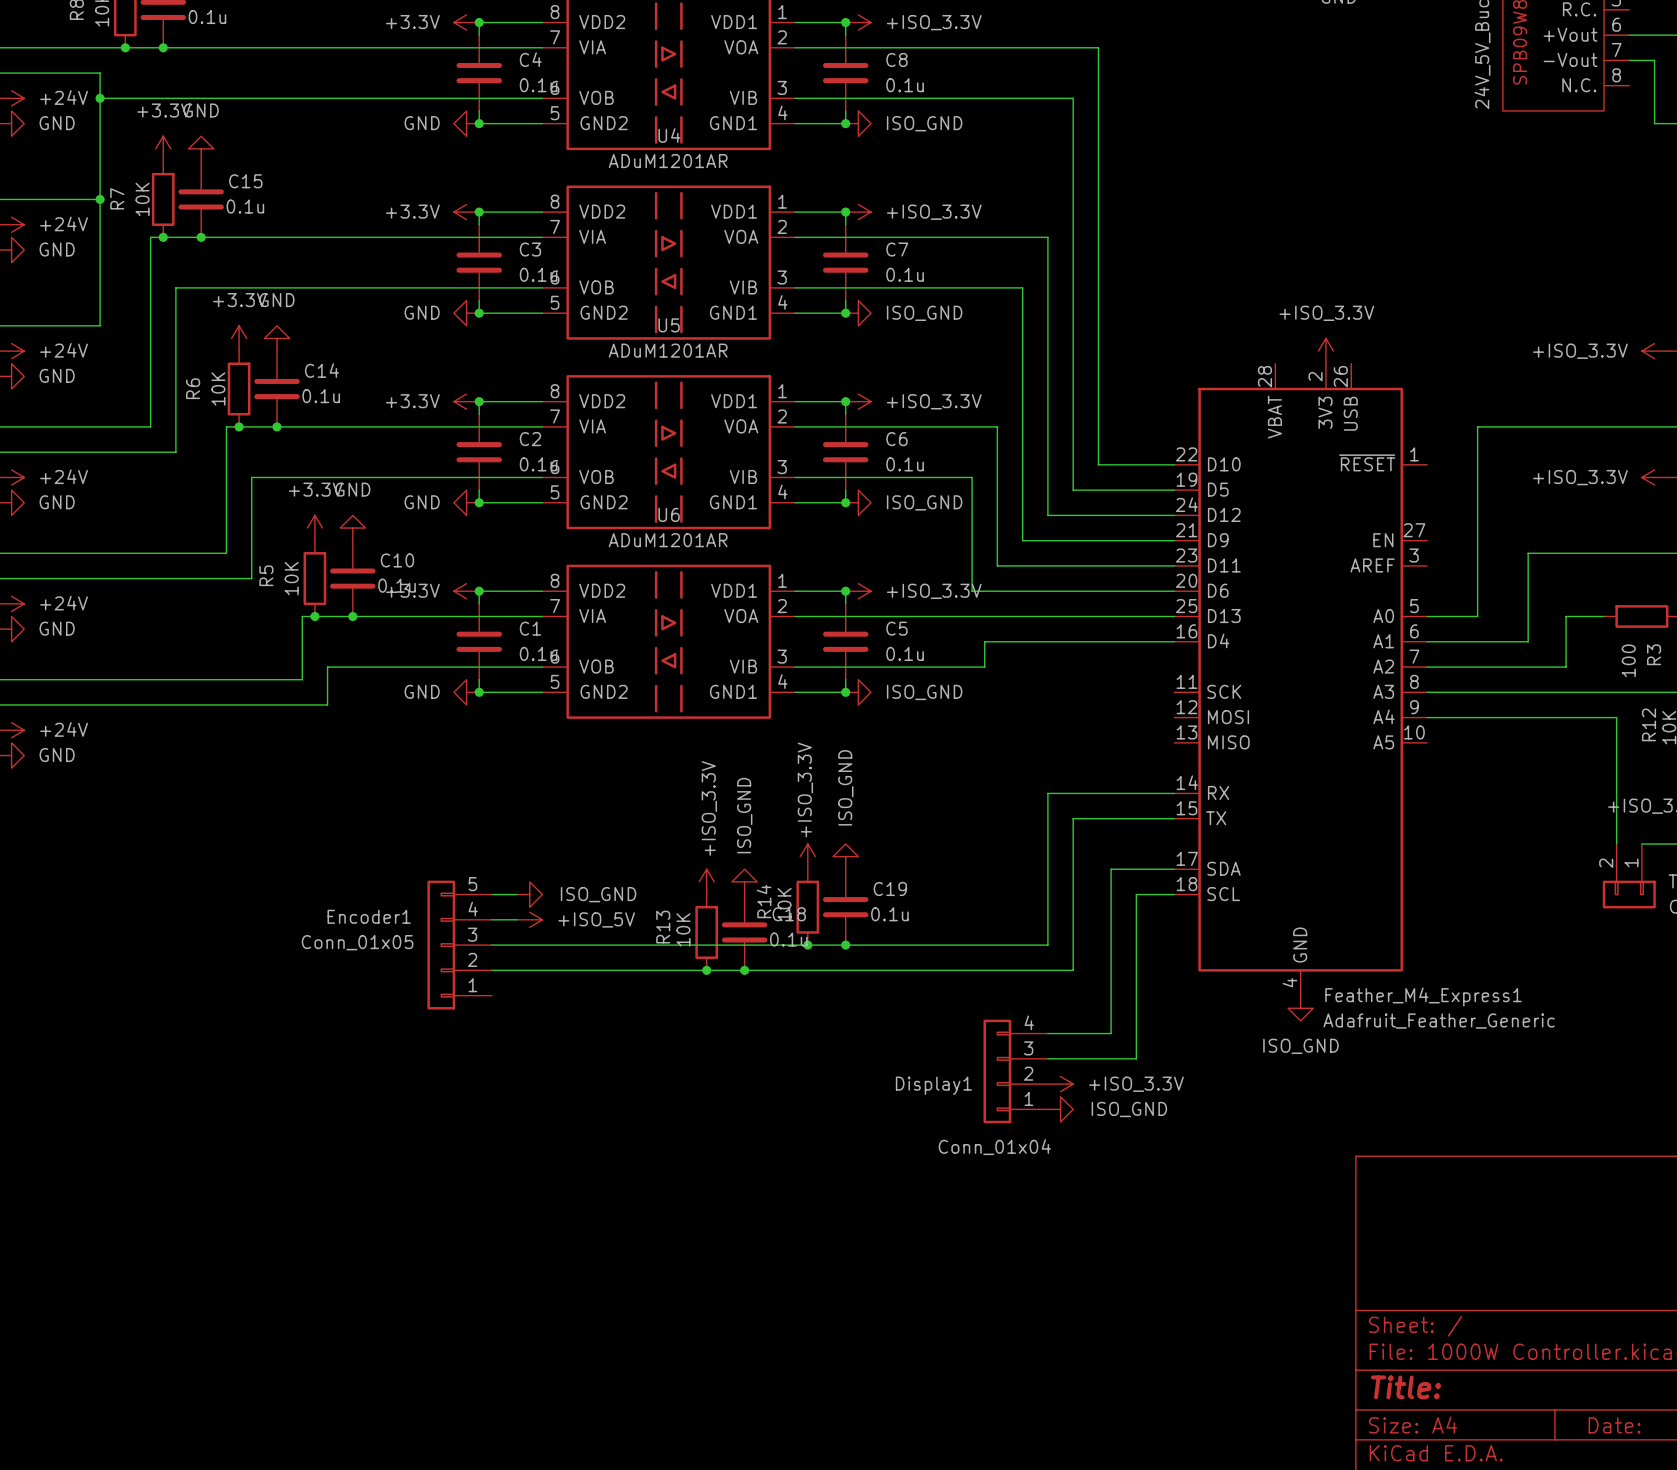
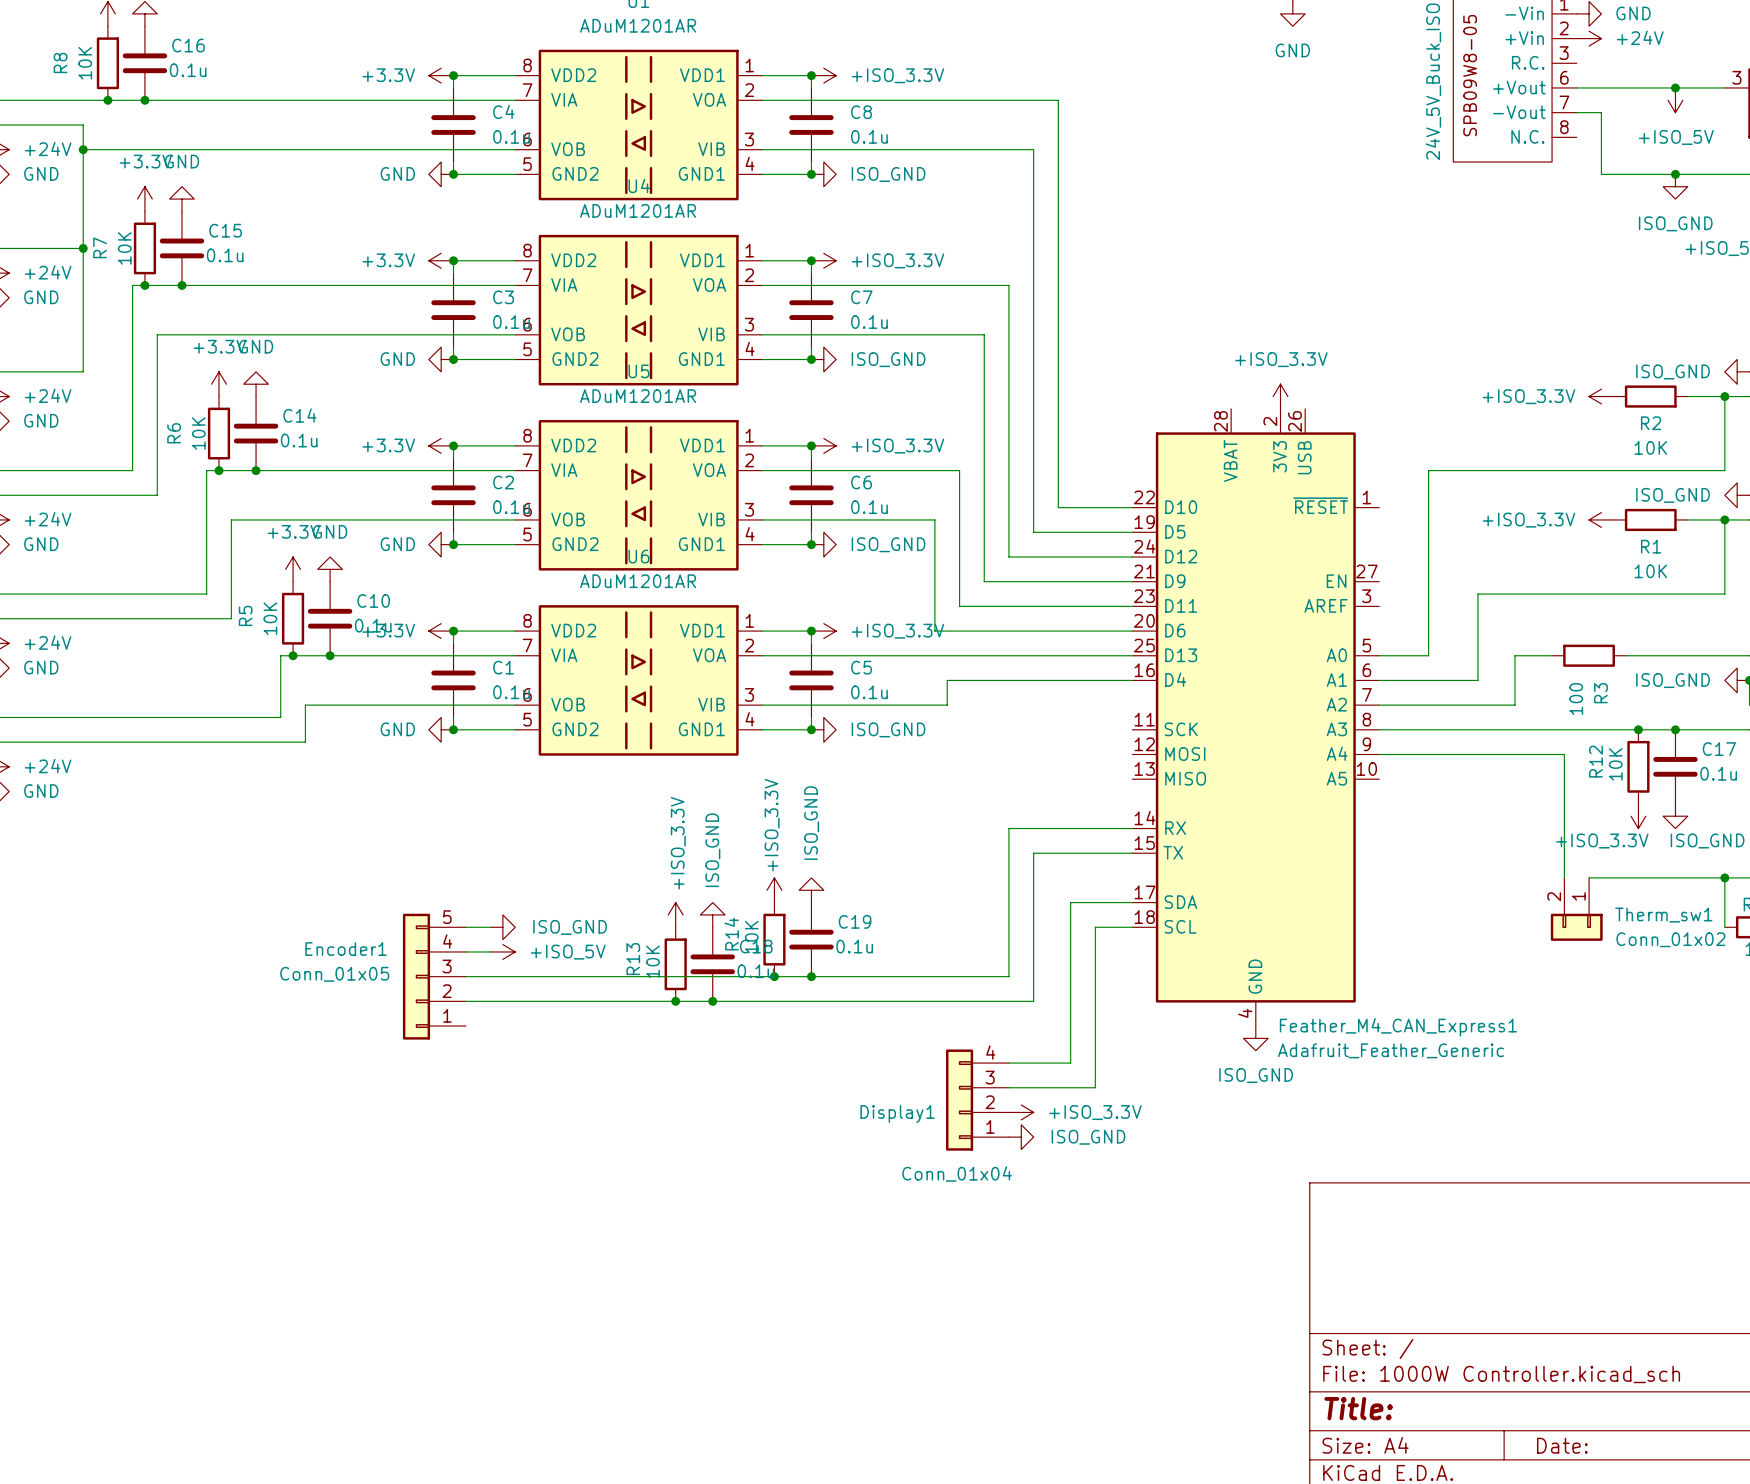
Feather_M4_Express1 name: Feather_M4_Express1 (1423, 996) -> Feather_M4_CAN_Express1 (1398, 1027)

